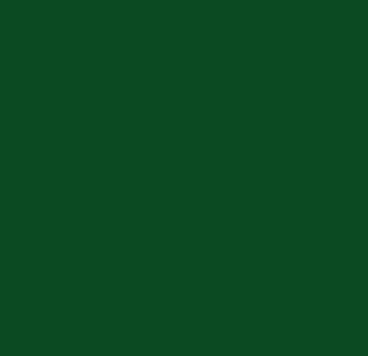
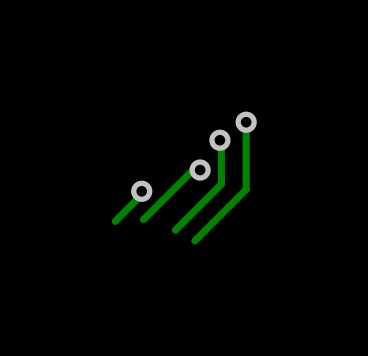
track: none -> (246, 122) (246, 189) (194, 240)
via: none -> (246, 122)
track: none -> (219, 140) (221, 184) (175, 230)
via: none -> (219, 140)
track: none -> (200, 170) (193, 170) (143, 219)
via: none -> (200, 170)
track: none -> (141, 191) (141, 194) (115, 221)
via: none -> (141, 191)

